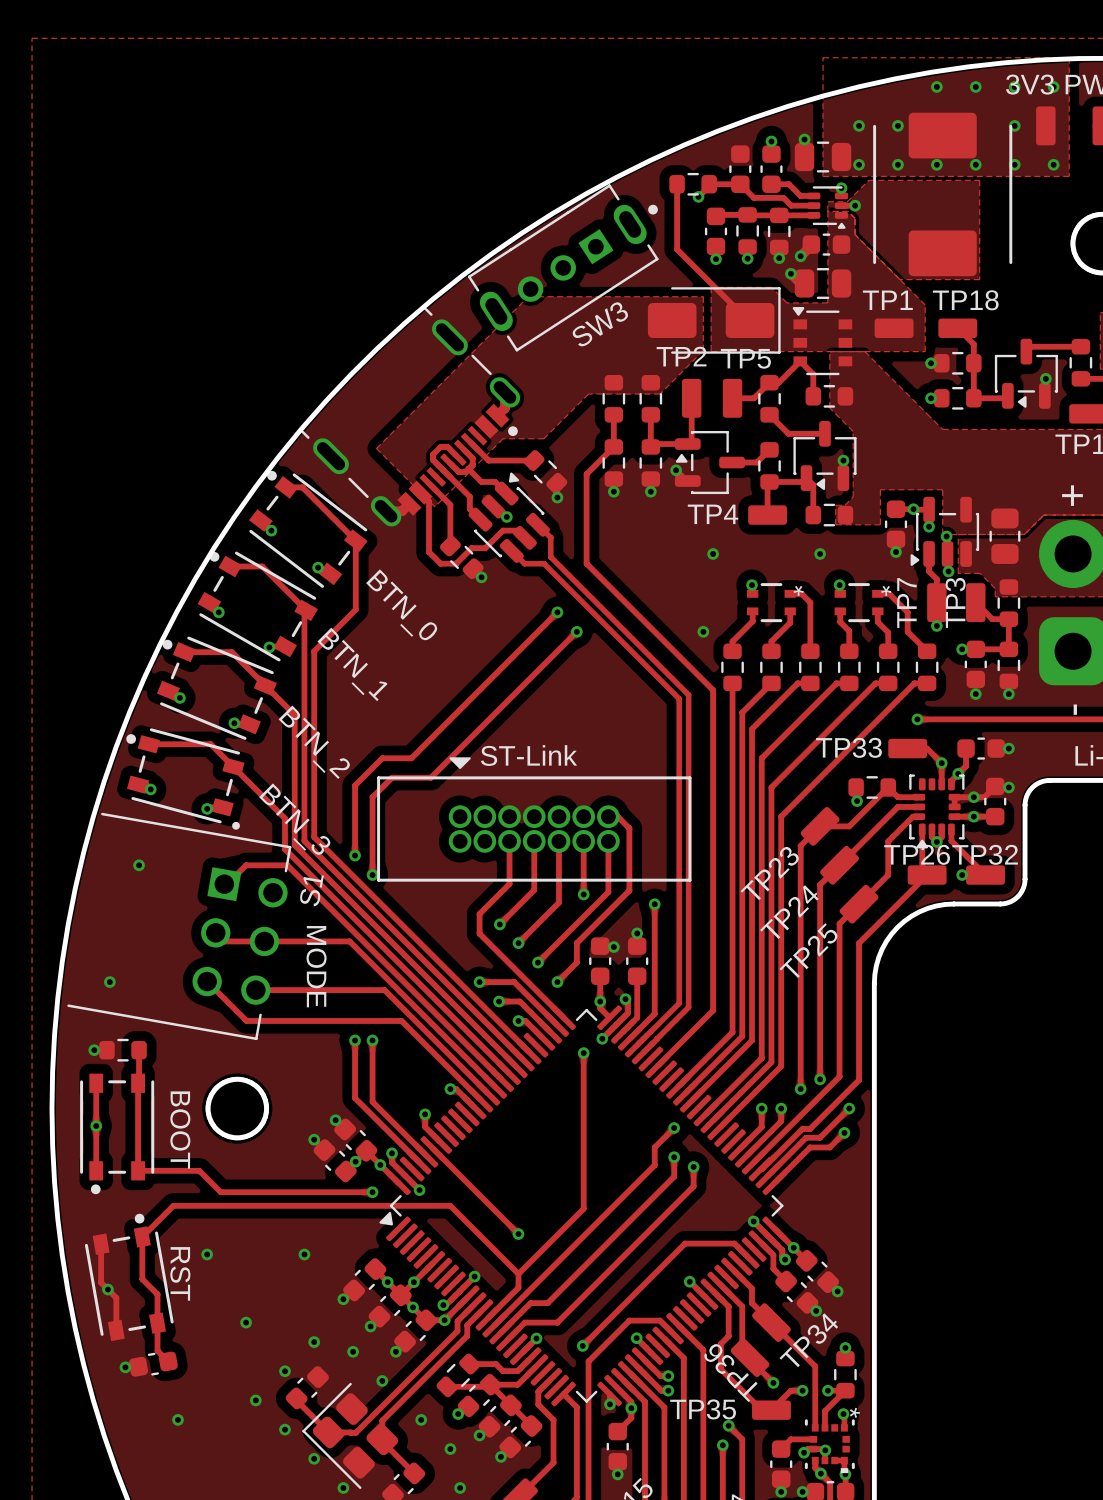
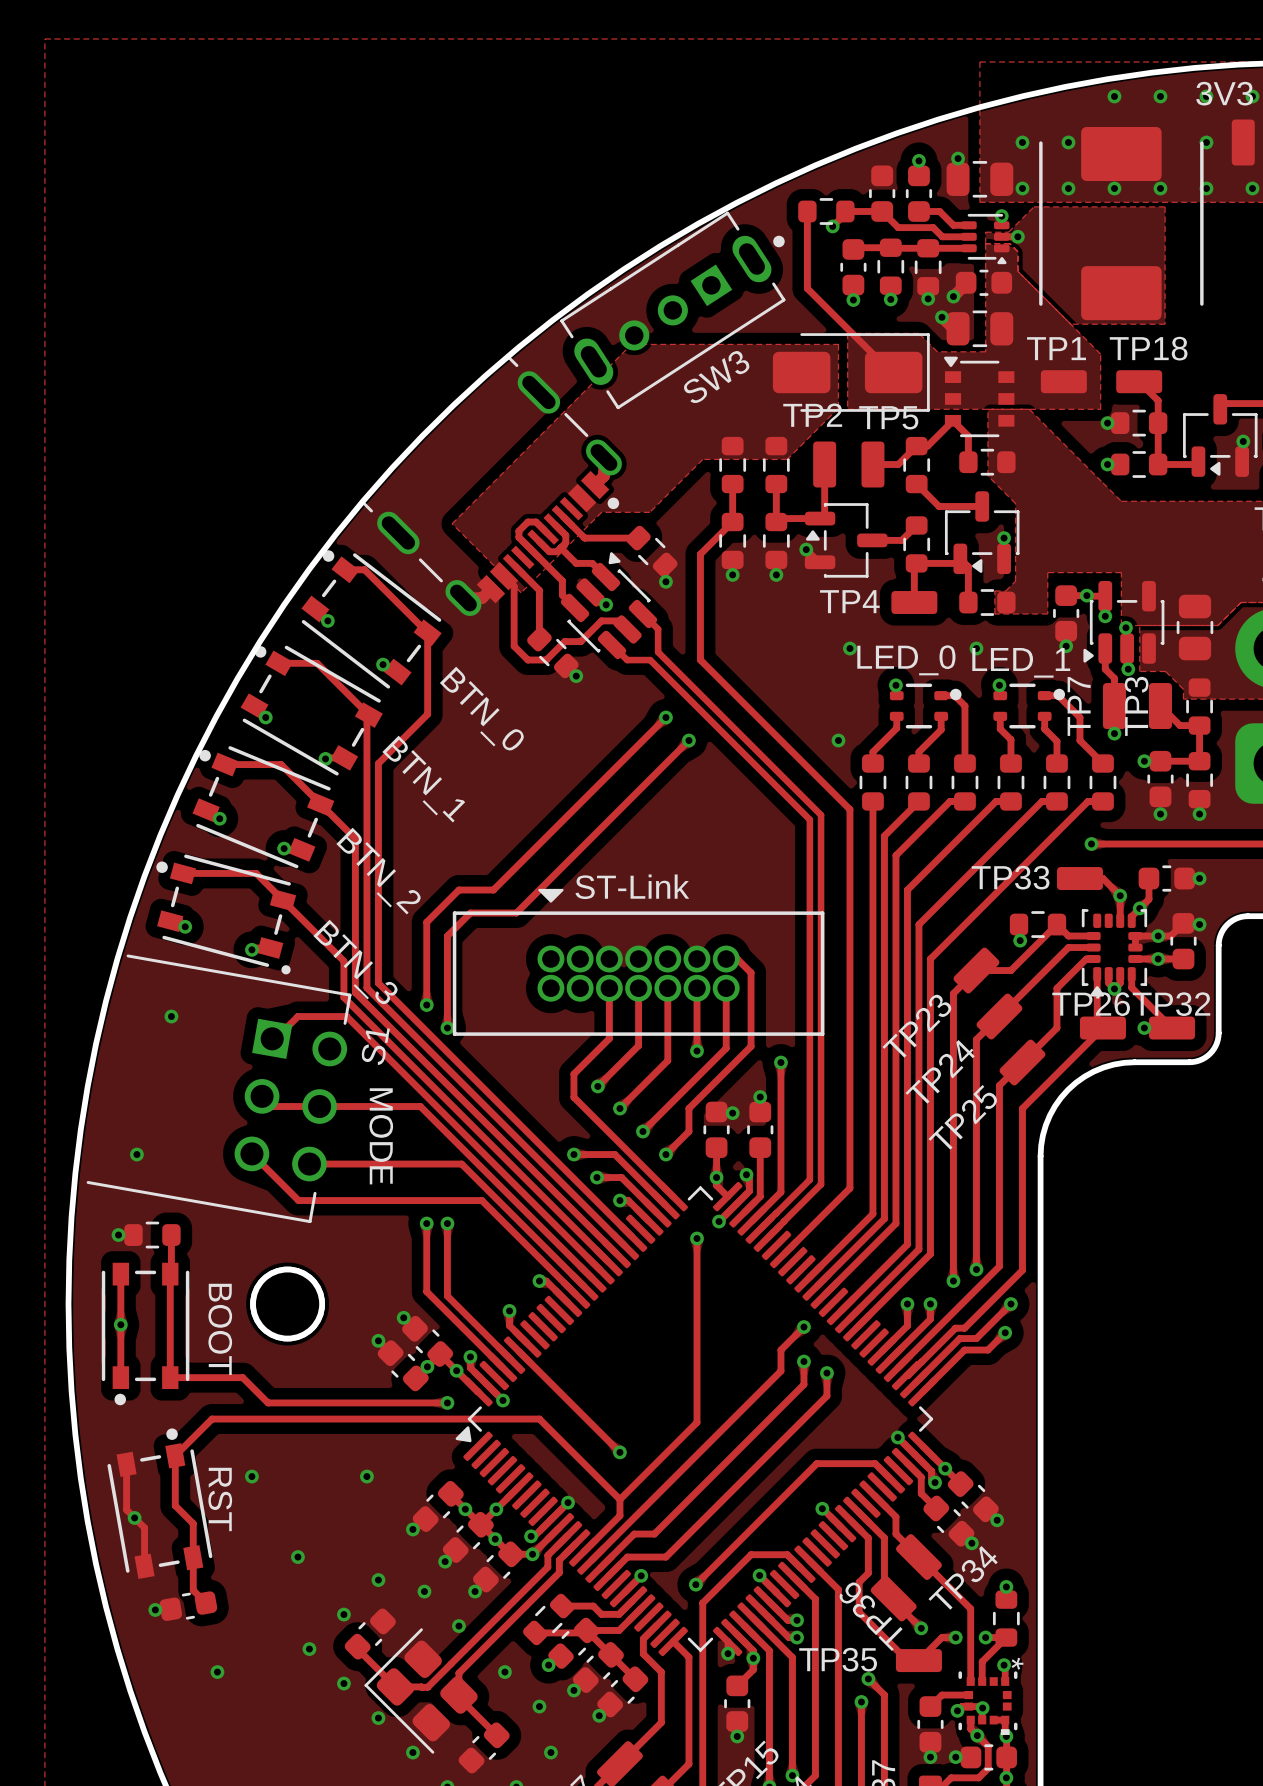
text: none -> LED_0 (906, 660)
text: none -> LED_1 (1021, 662)
part footprint: [747, 583, 796, 623] -> [889, 683, 962, 729]
part footprint: [834, 583, 884, 623] -> [993, 683, 1066, 729]

